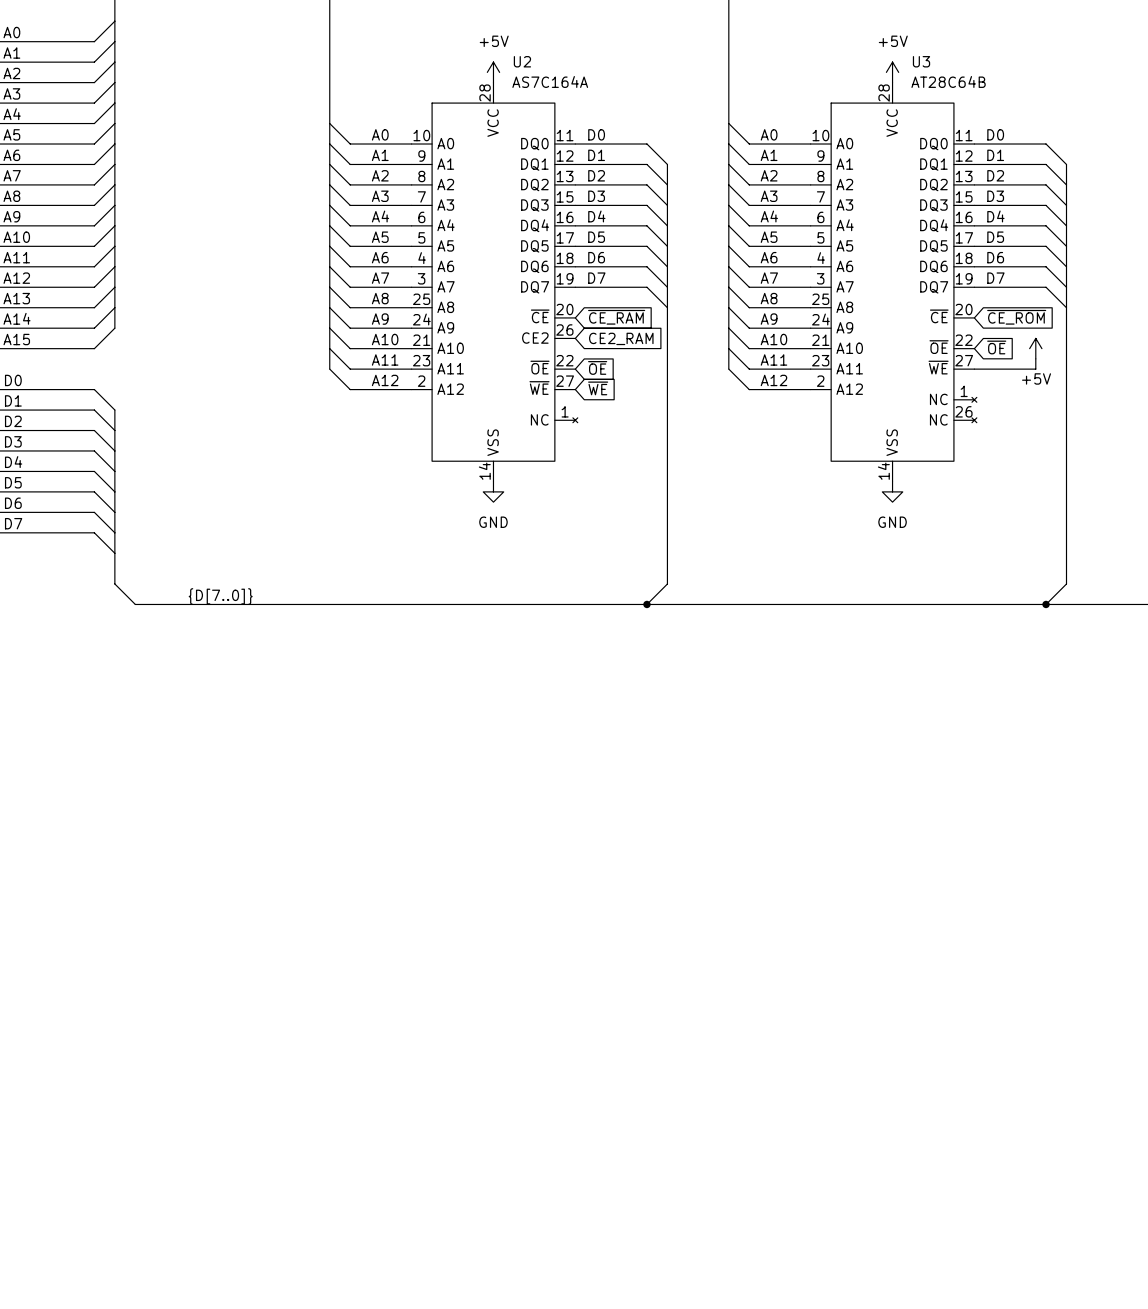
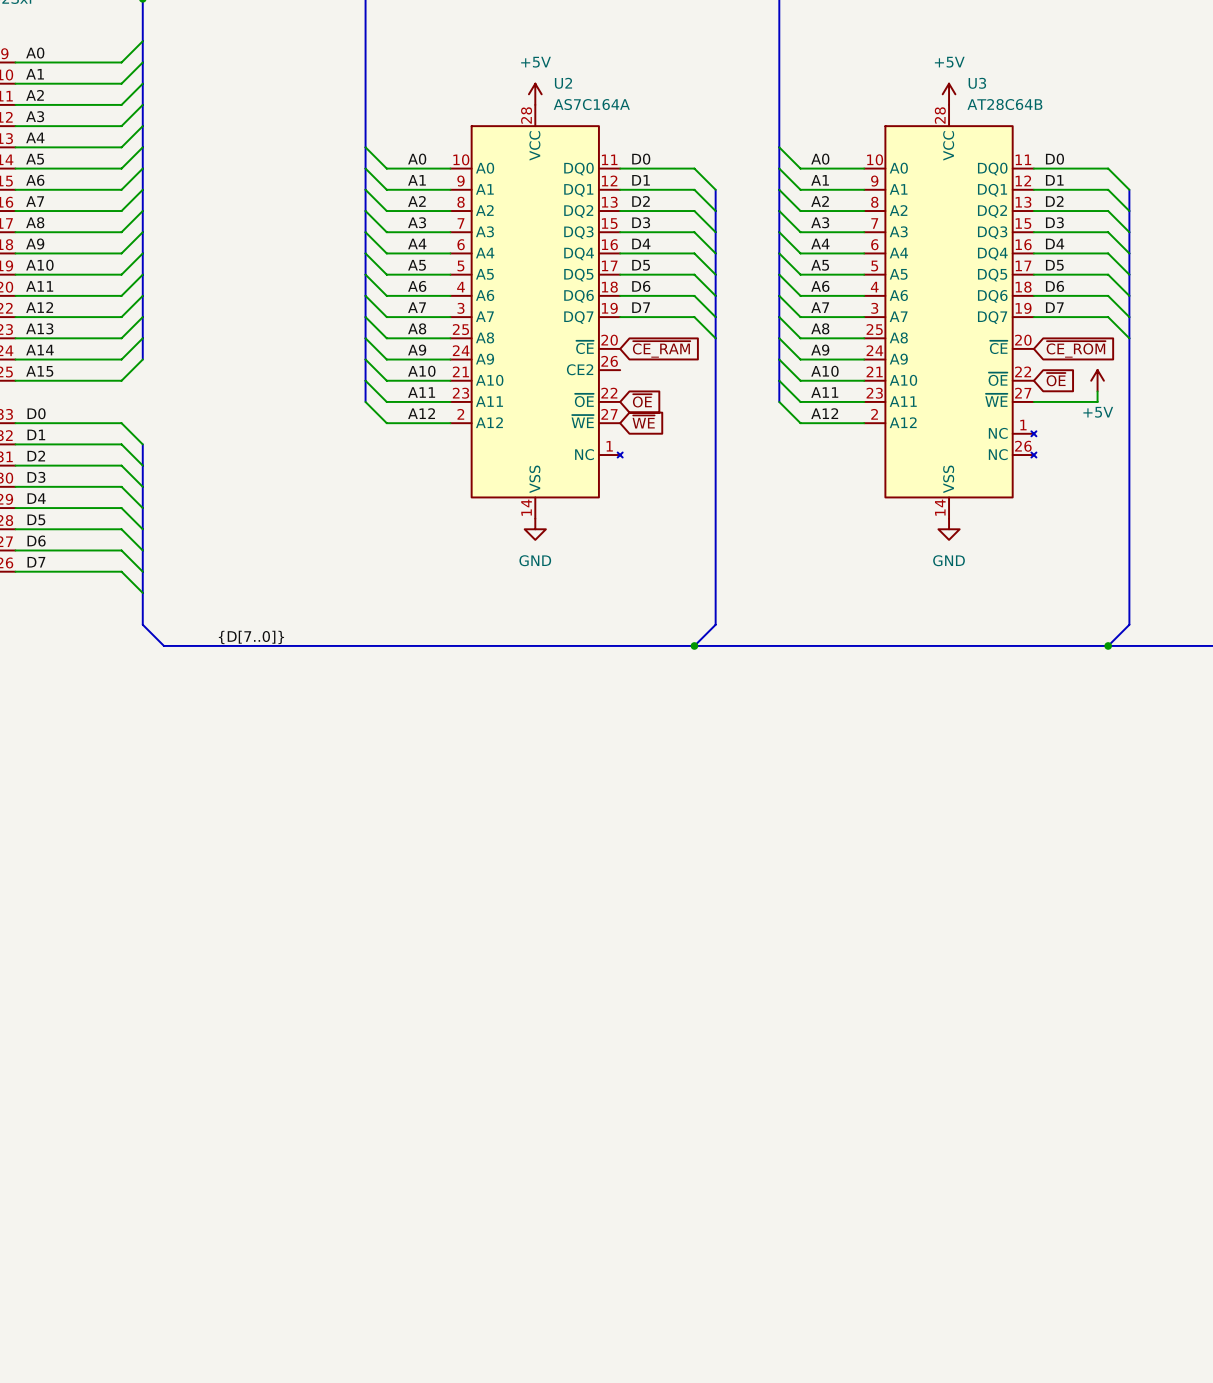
global label: CE2_RAM (621, 338) -> none

